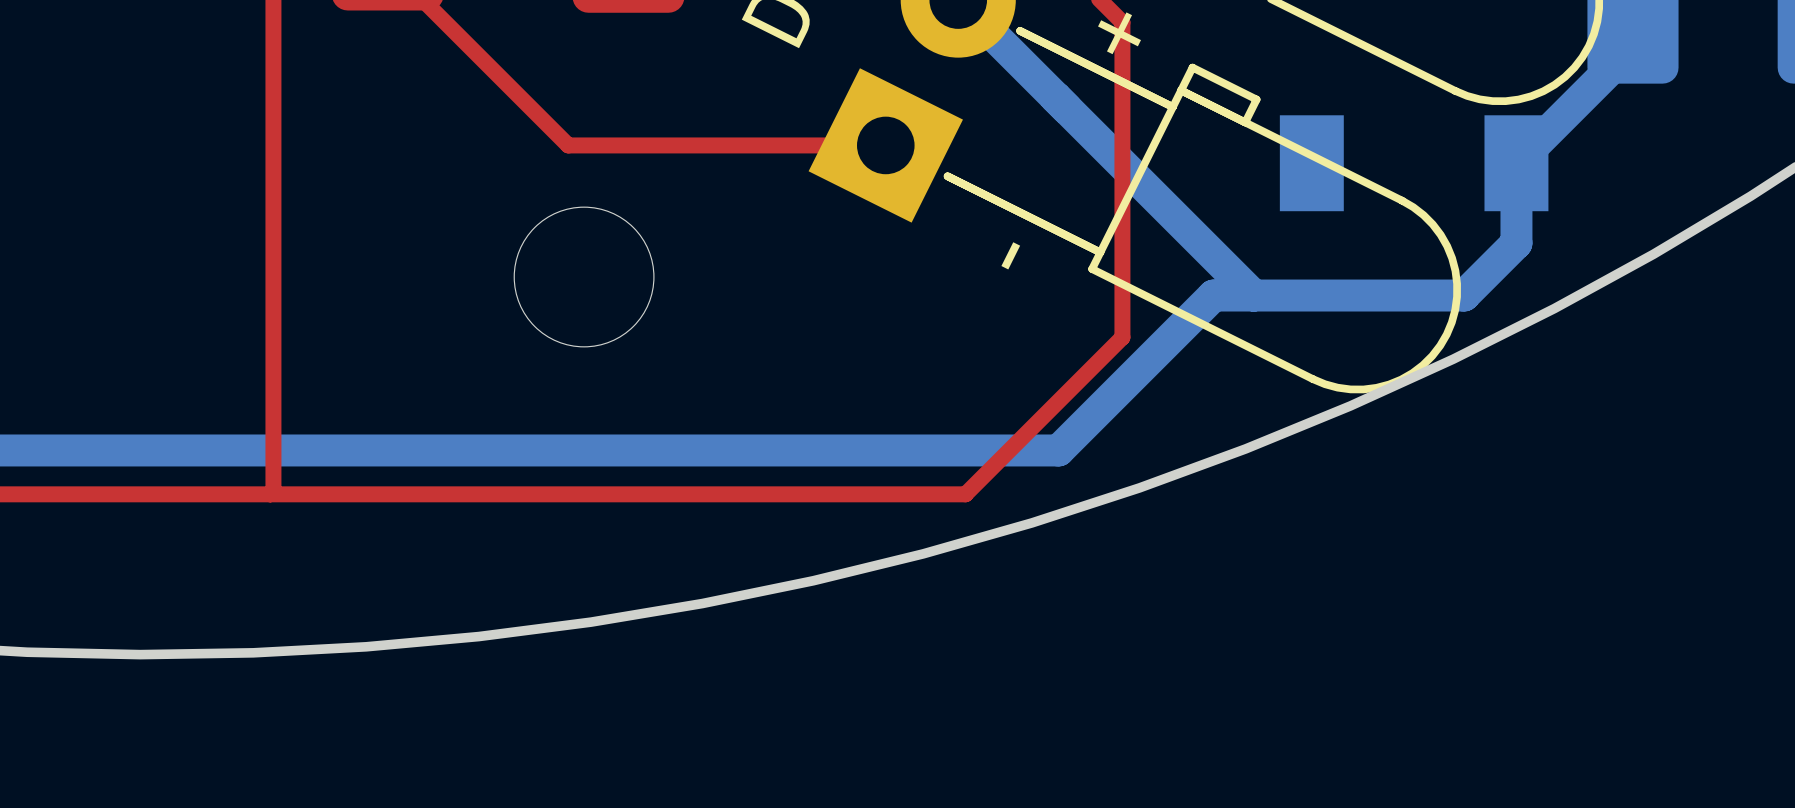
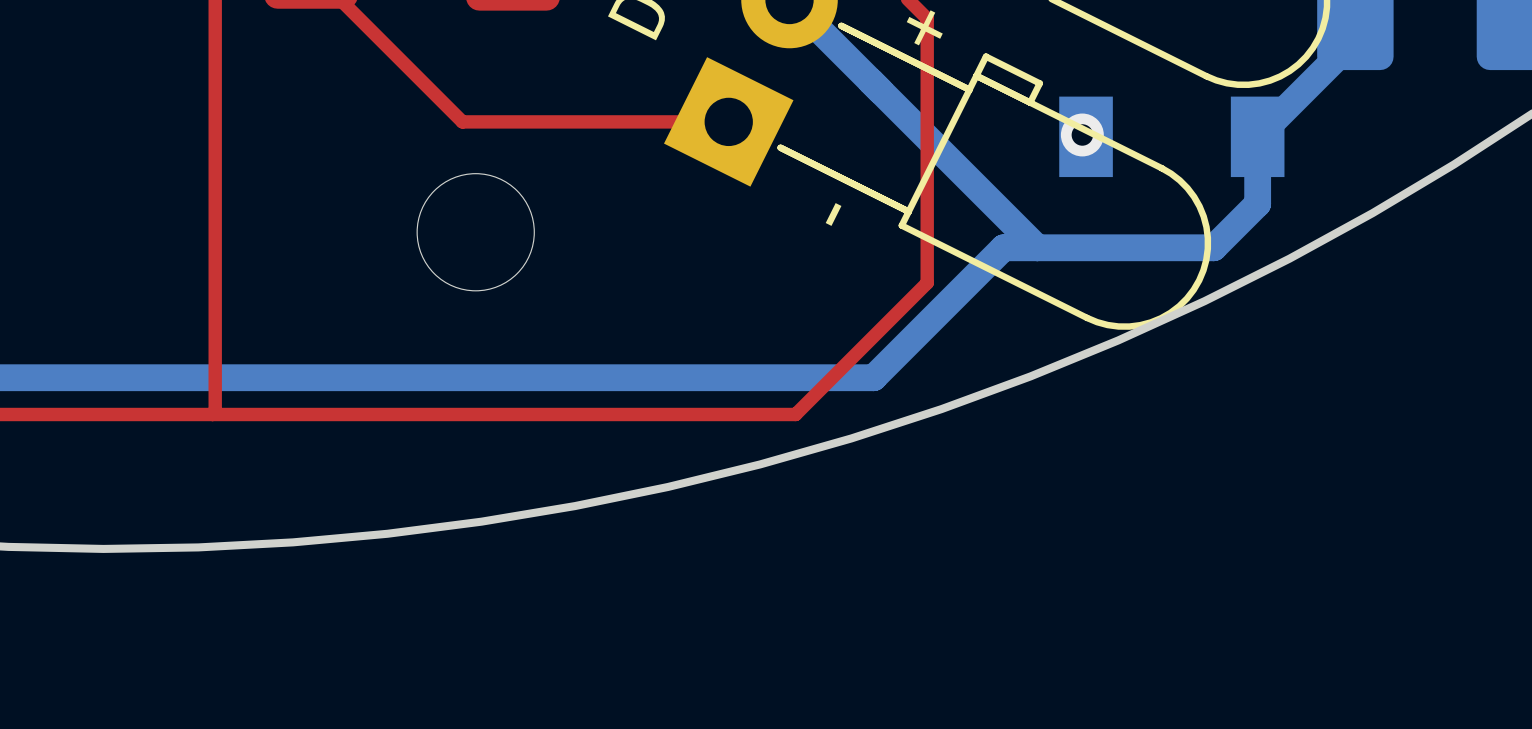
via: none -> (1082, 134)

